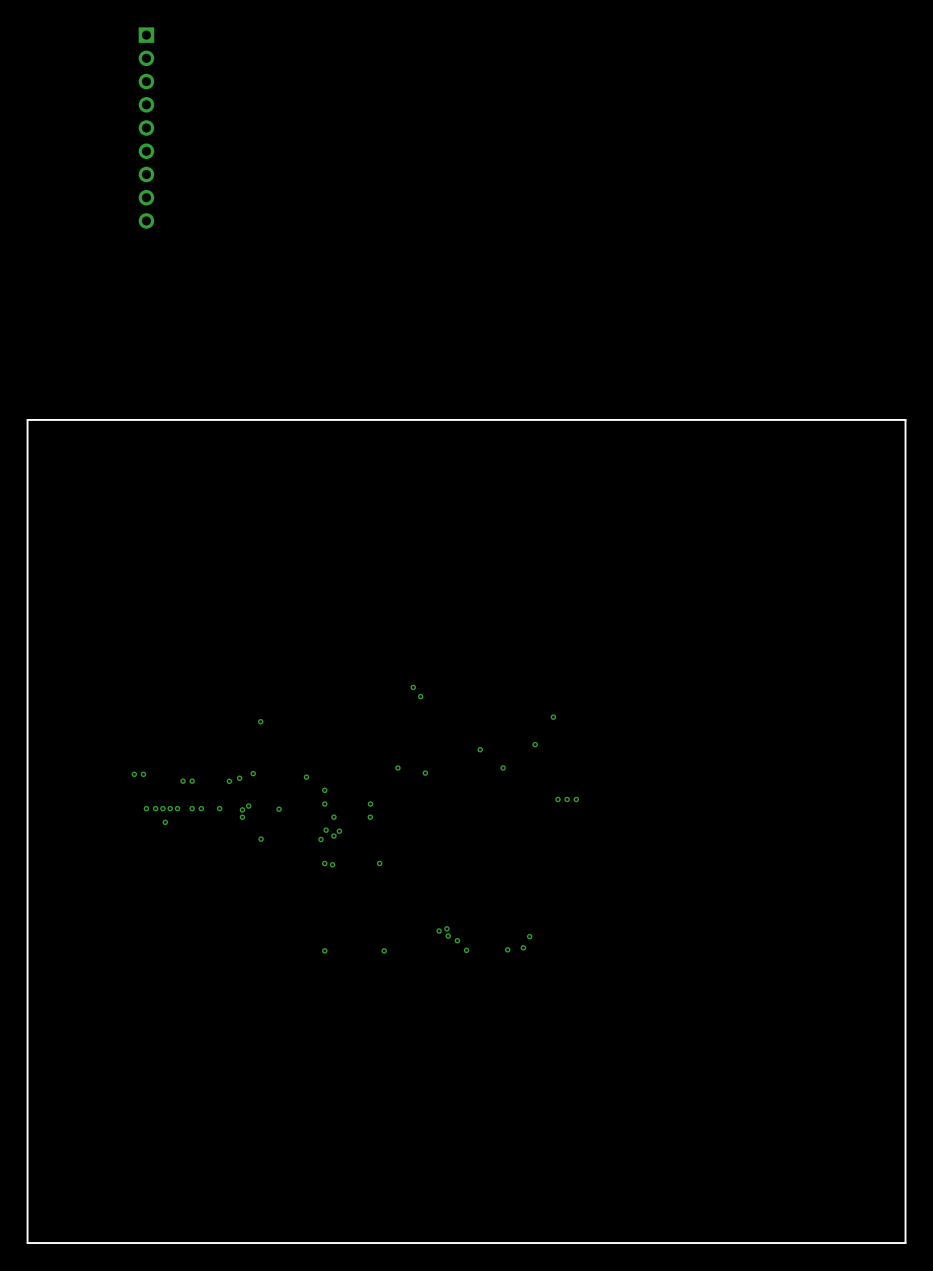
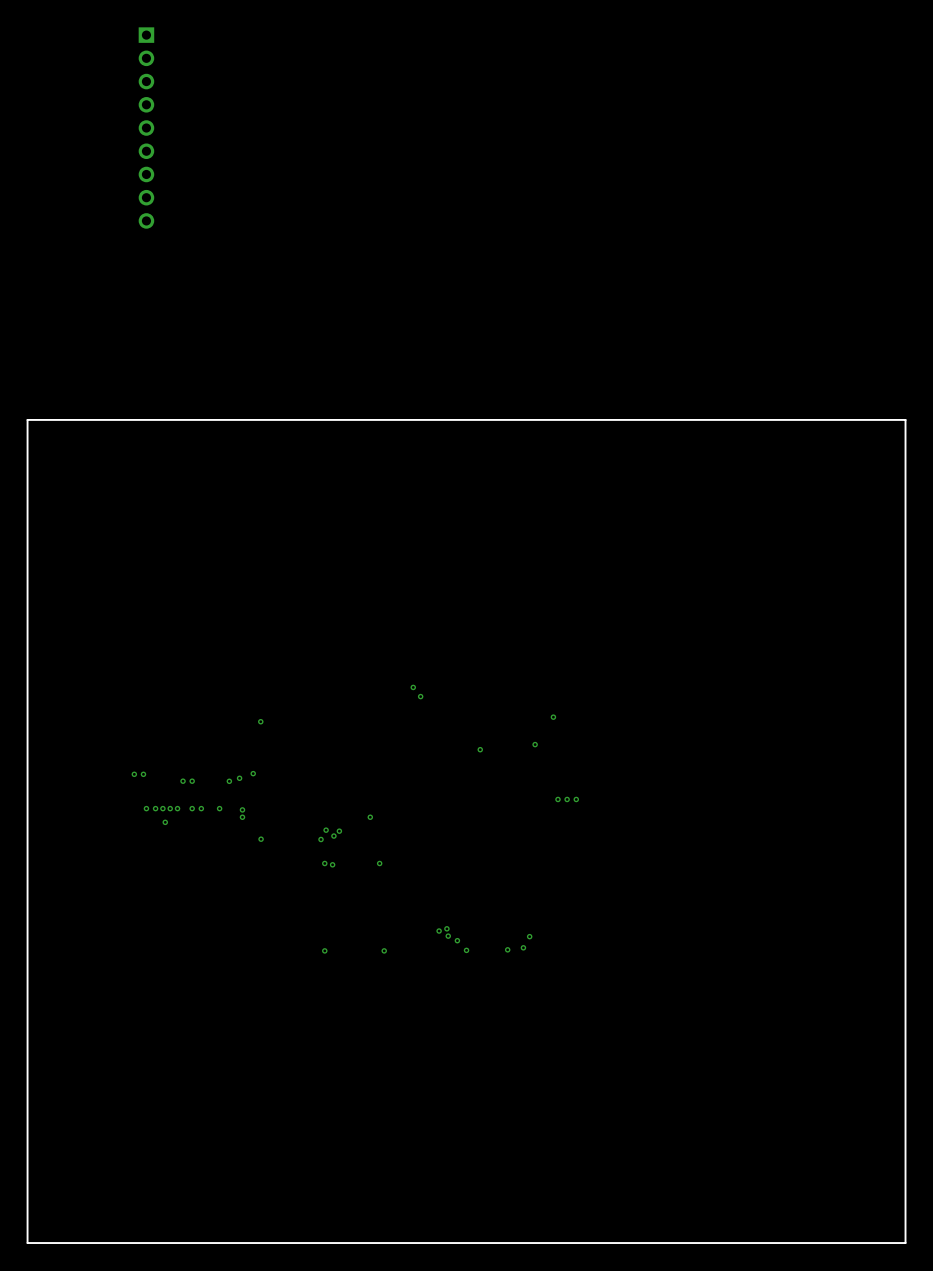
via: (397, 767) -> none
via: (503, 767) -> none
via: (425, 773) -> none
via: (306, 777) -> none
via: (324, 790) -> none
via: (324, 804) -> none
via: (370, 804) -> none
via: (248, 806) -> none
via: (279, 809) -> none
via: (333, 817) -> none

